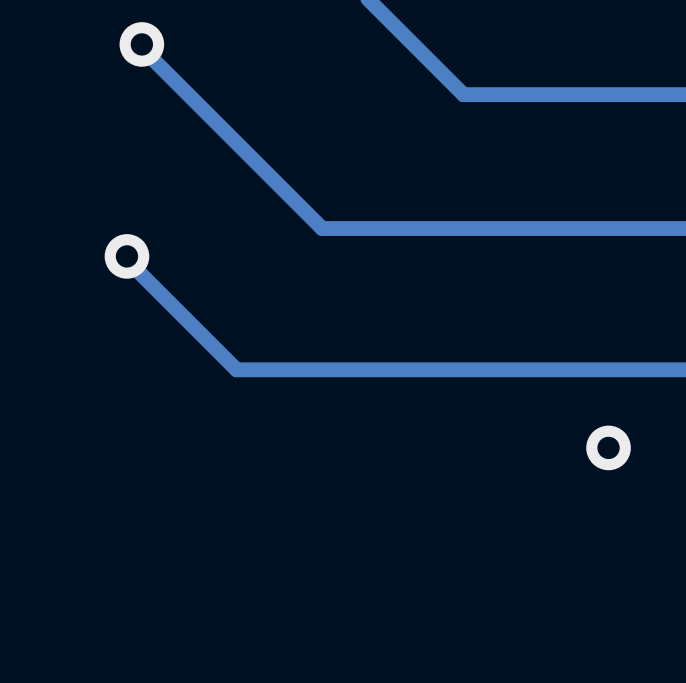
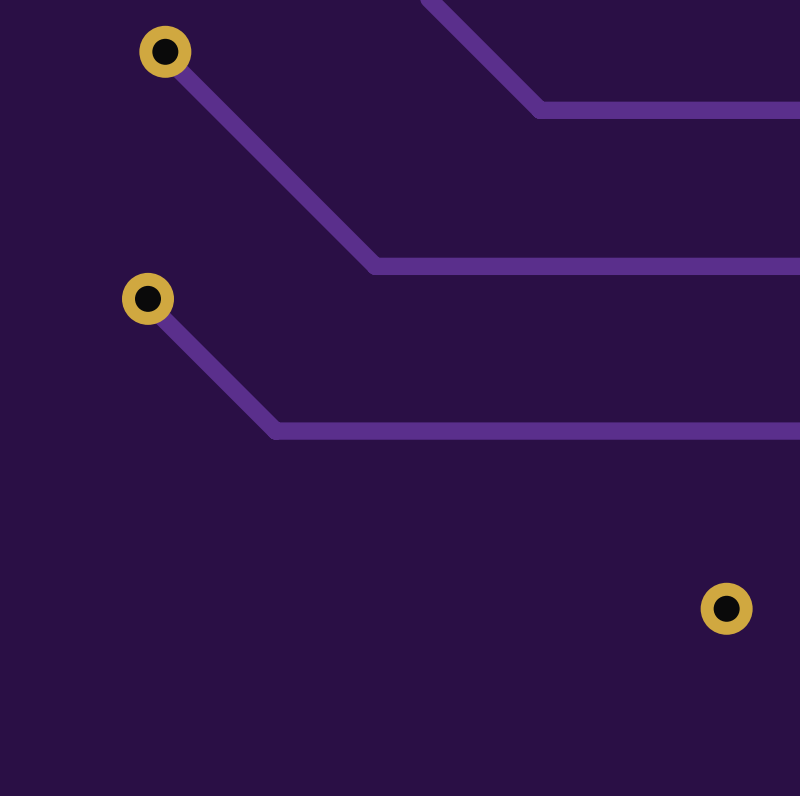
via: (608, 447) -> none
via: none -> (726, 608)

